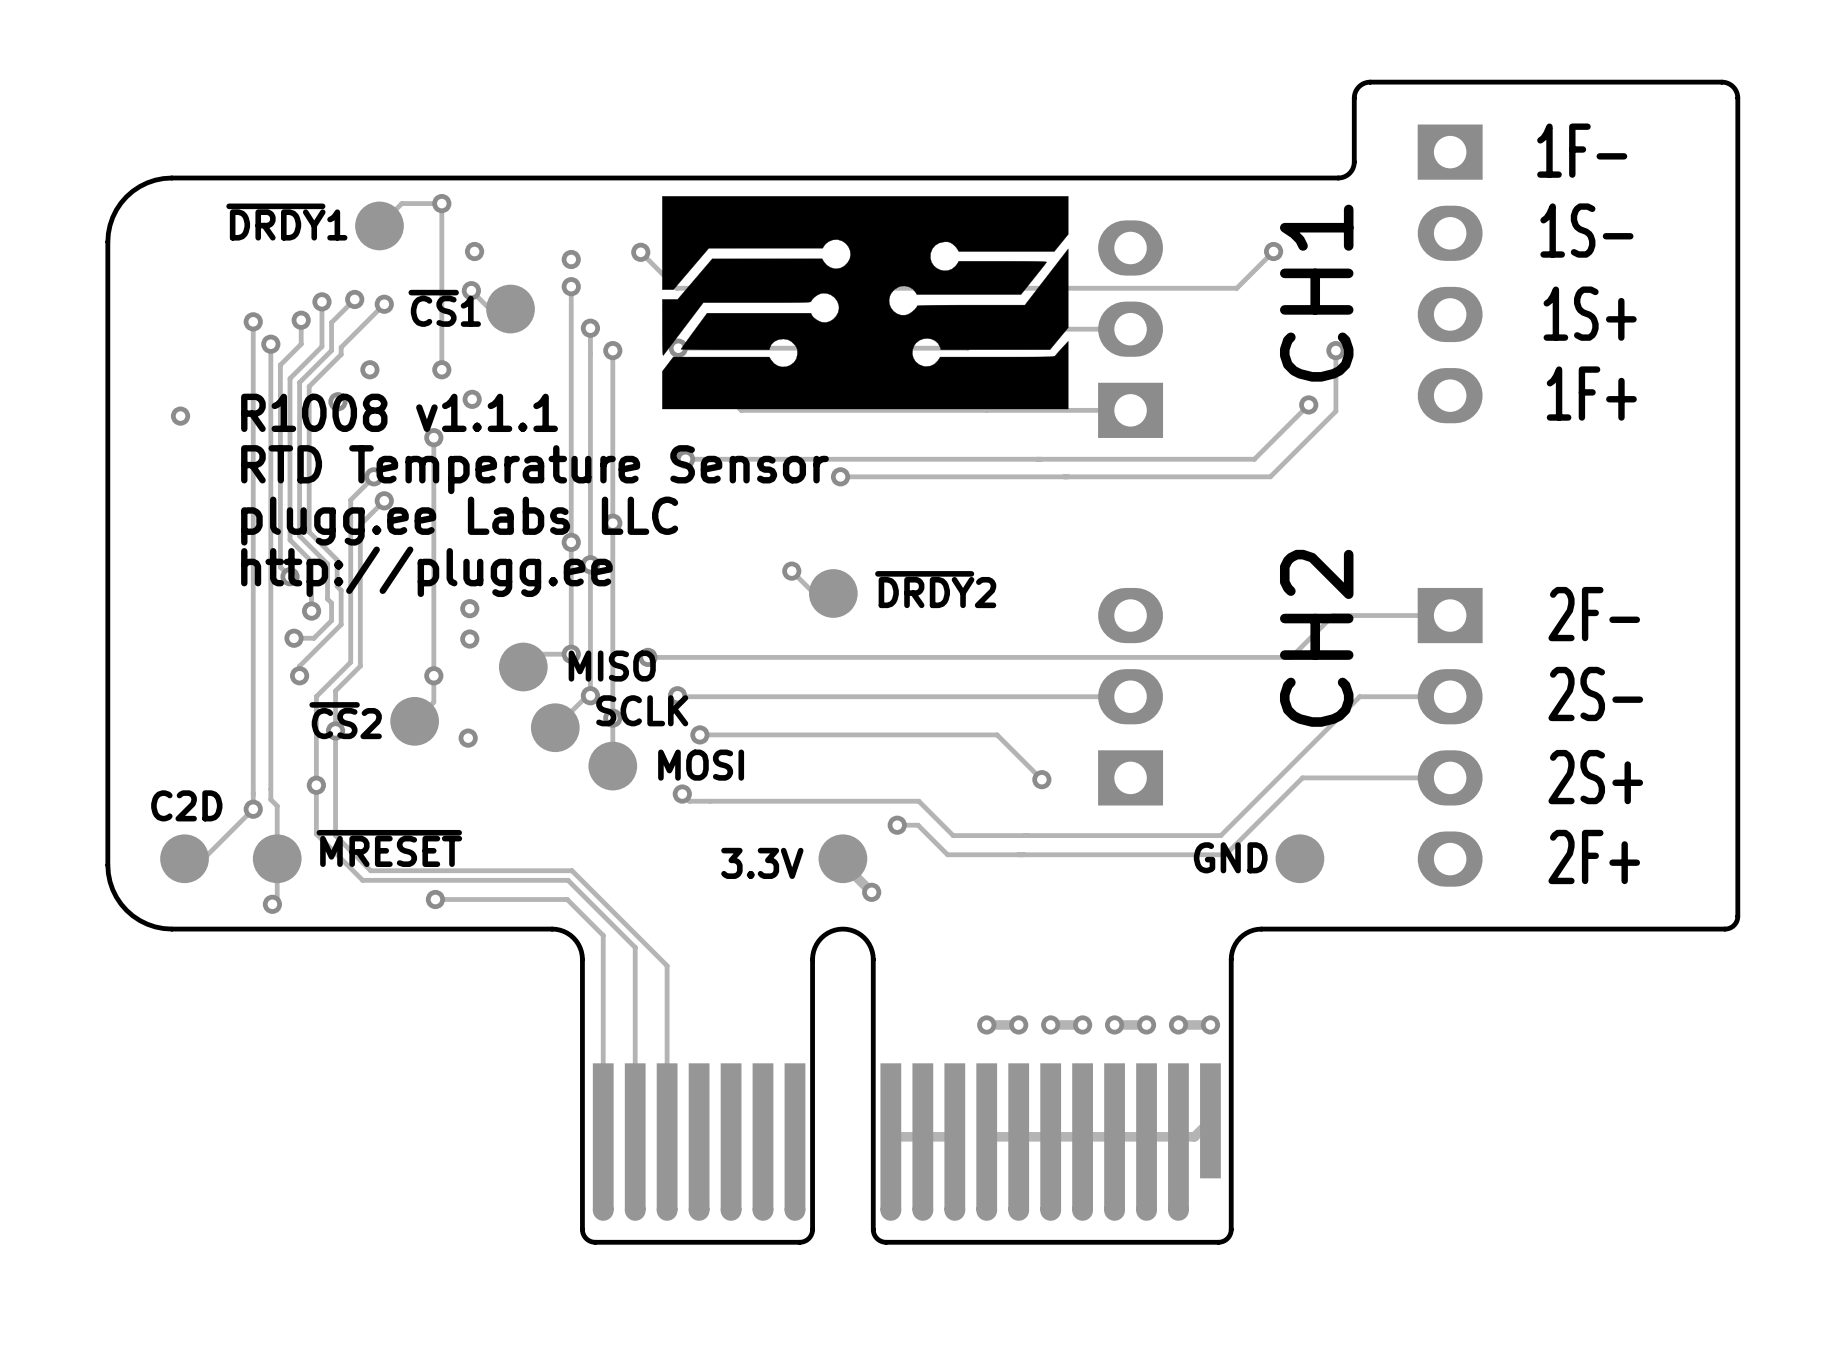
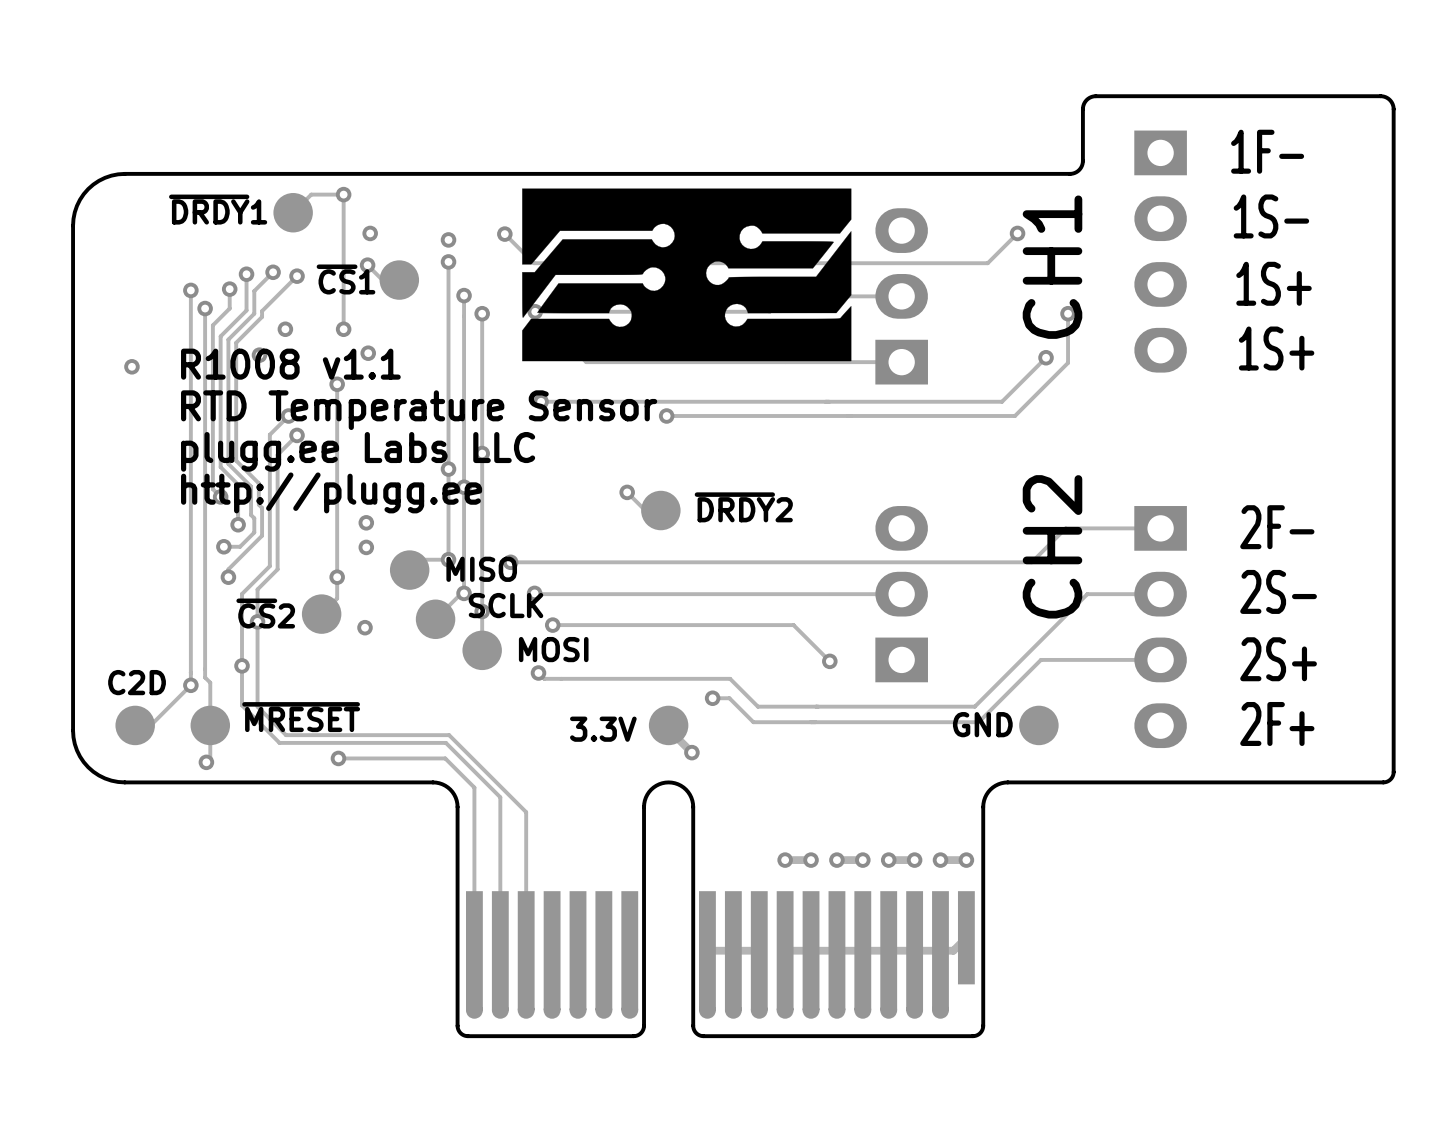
text: 1F+ (1591, 393) -> 1S+ (1276, 348)
text: R1008 v1.1.1 (399, 412) -> R1008 v1.1 (290, 364)

